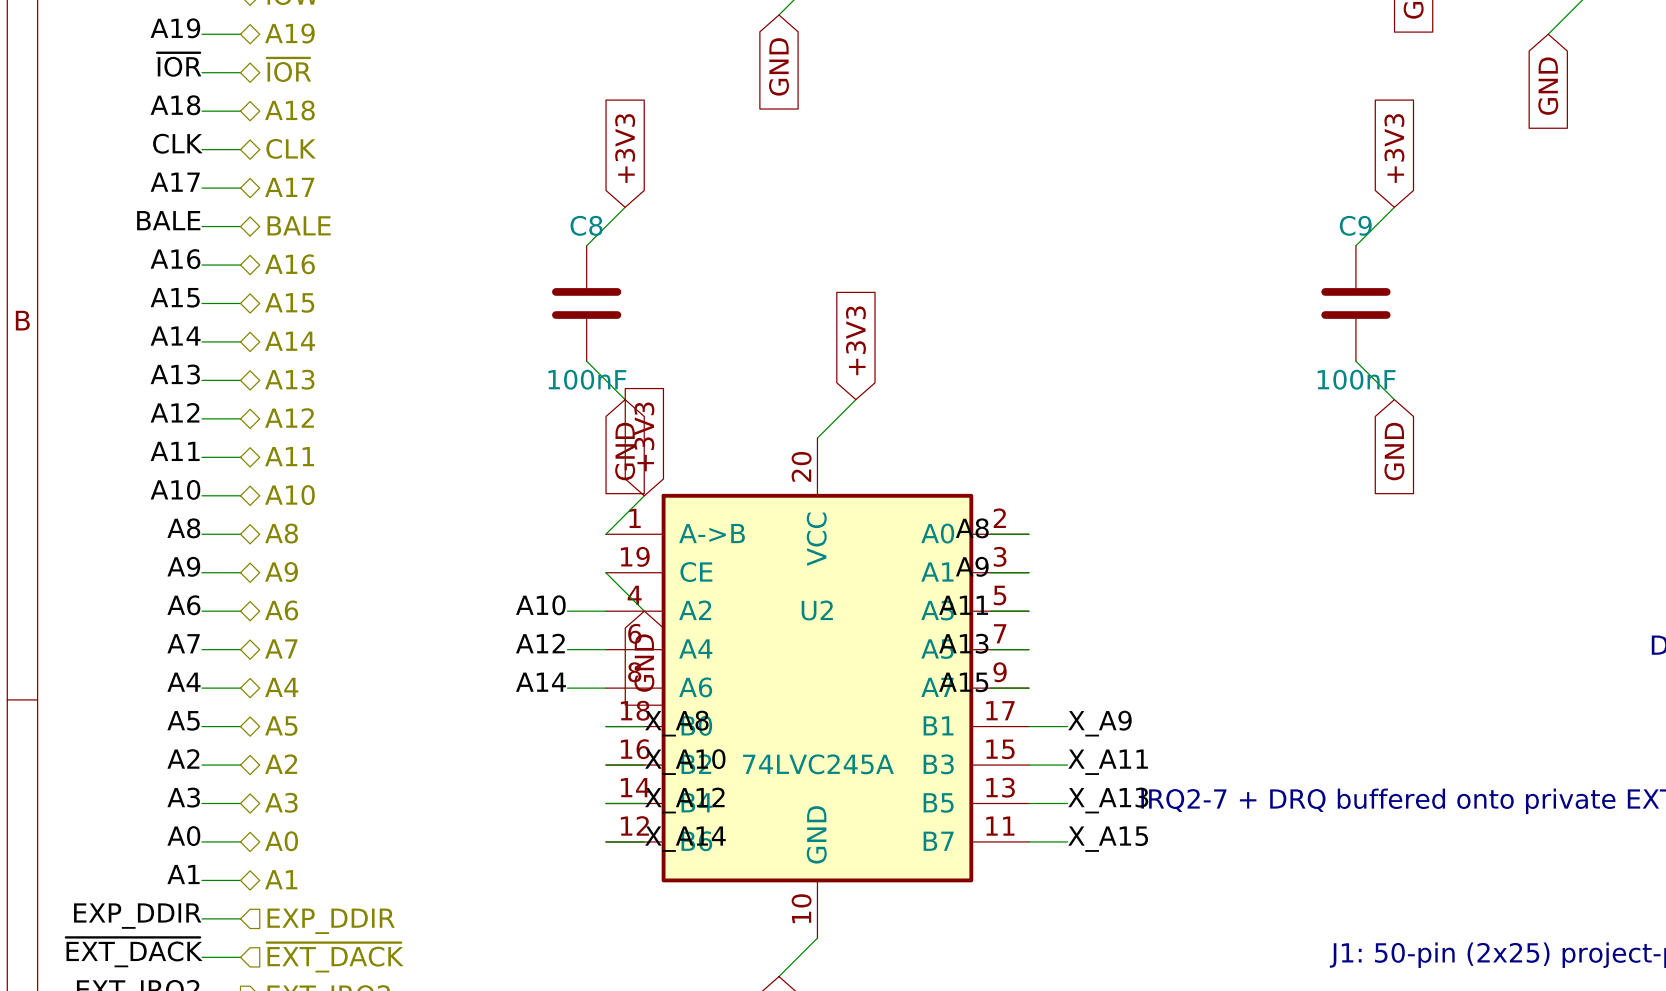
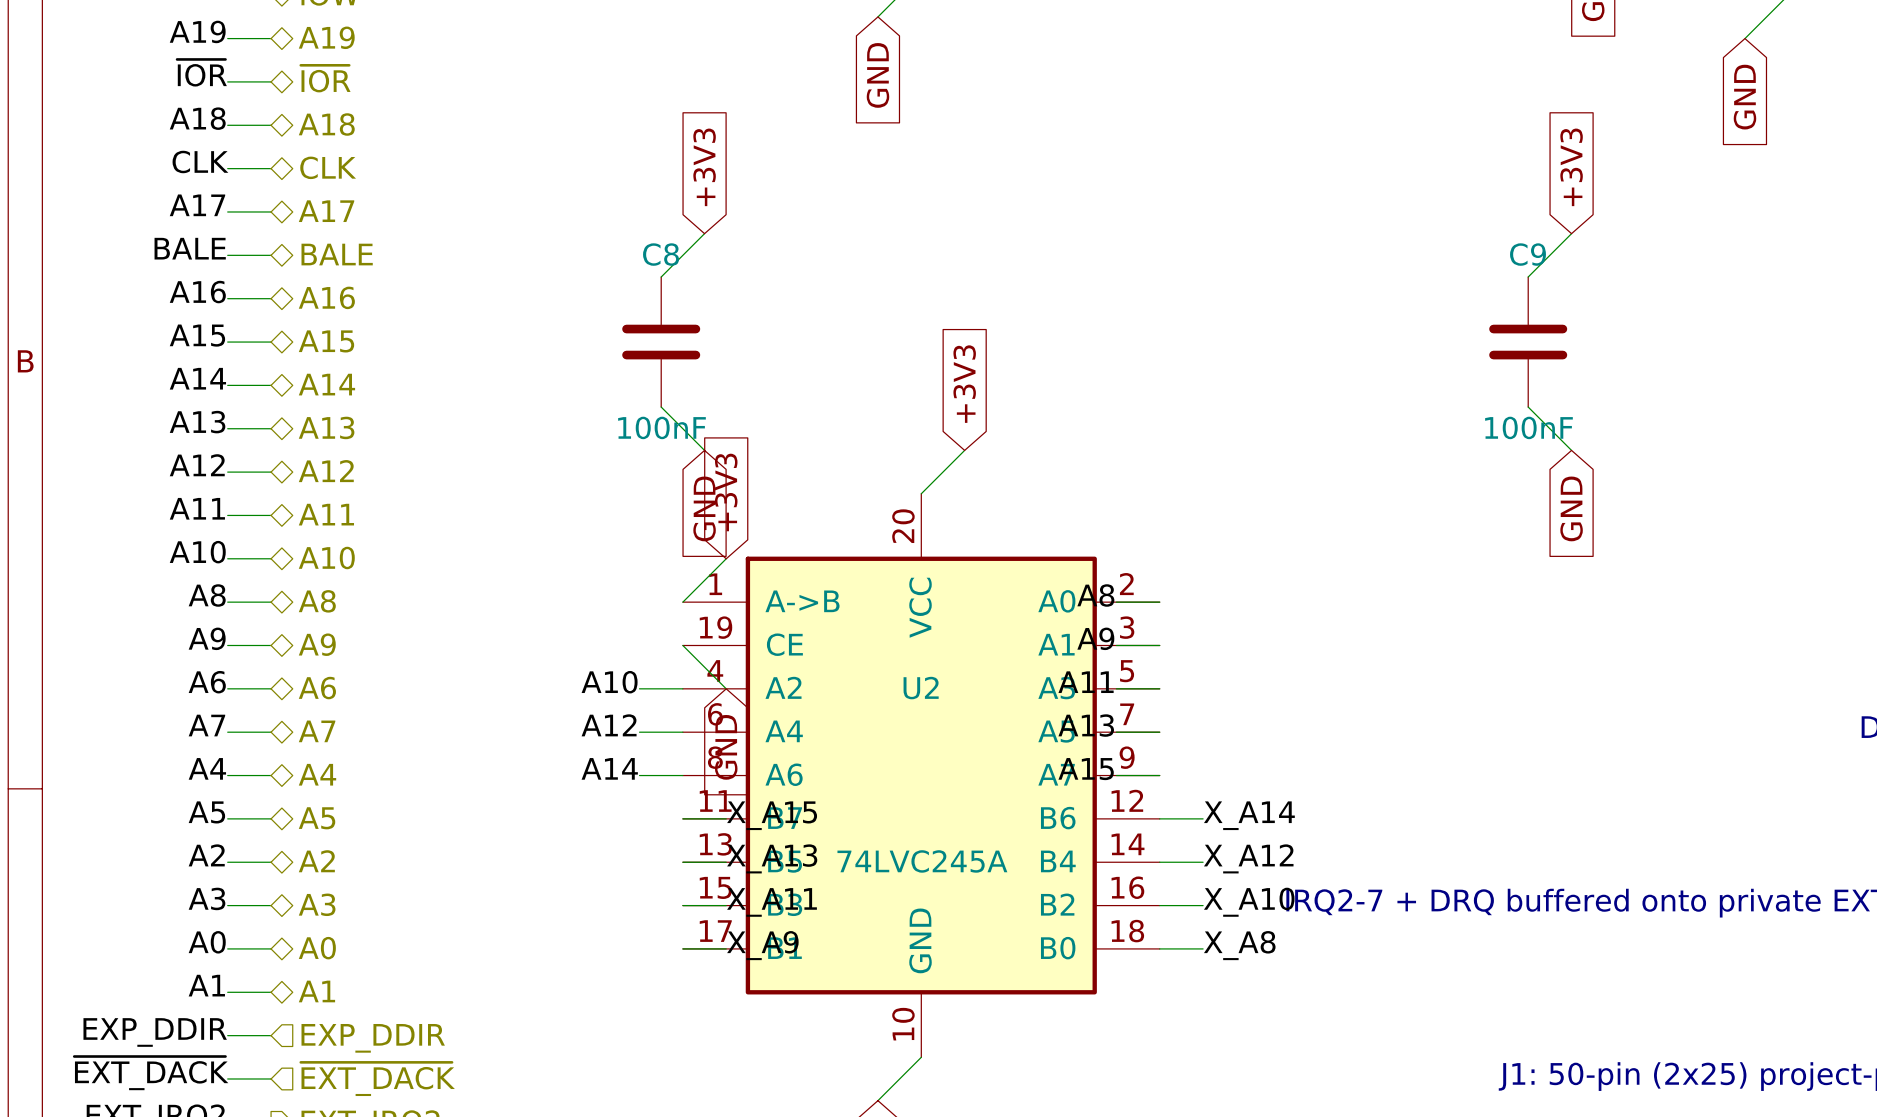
U2 symbol: [605, 438, 1030, 939] -> [682, 493, 1160, 1058]
label: X_A8 (676, 723) -> X_A15 (772, 815)
label: X_A9 (1099, 723) -> X_A14 (1249, 815)
label: X_A10 (685, 762) -> X_A13 (772, 858)
label: X_A11 (1108, 762) -> X_A12 (1248, 858)
label: X_A12 (684, 800) -> X_A11 (772, 902)
label: X_A13 (1108, 800) -> X_A10 (1249, 902)
label: X_A14 (685, 839) -> X_A9 (762, 945)
label: X_A15 (1108, 839) -> X_A8 (1239, 945)

